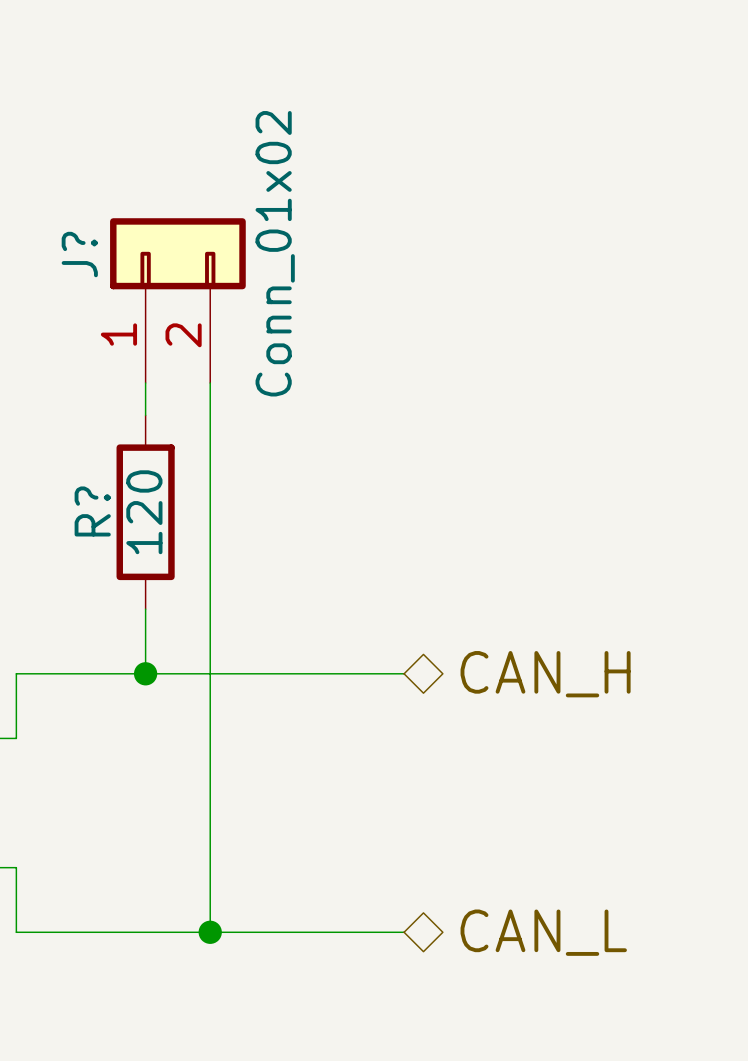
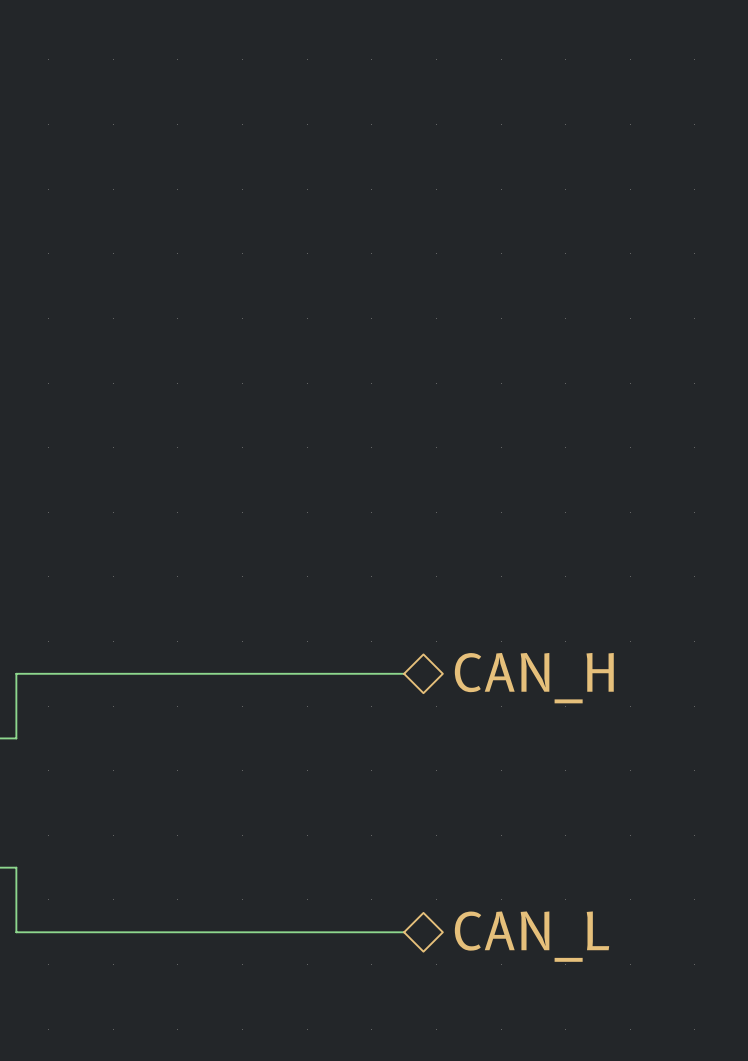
J?: Conn_01x02 (177, 300) -> none
wire: (145, 383) (145, 415) -> none
wire: (210, 383) (210, 932) -> none
R?: 120 (145, 512) -> none
wire: (145, 609) (145, 673) -> none
junction: (145, 673) -> none
junction: (210, 932) -> none

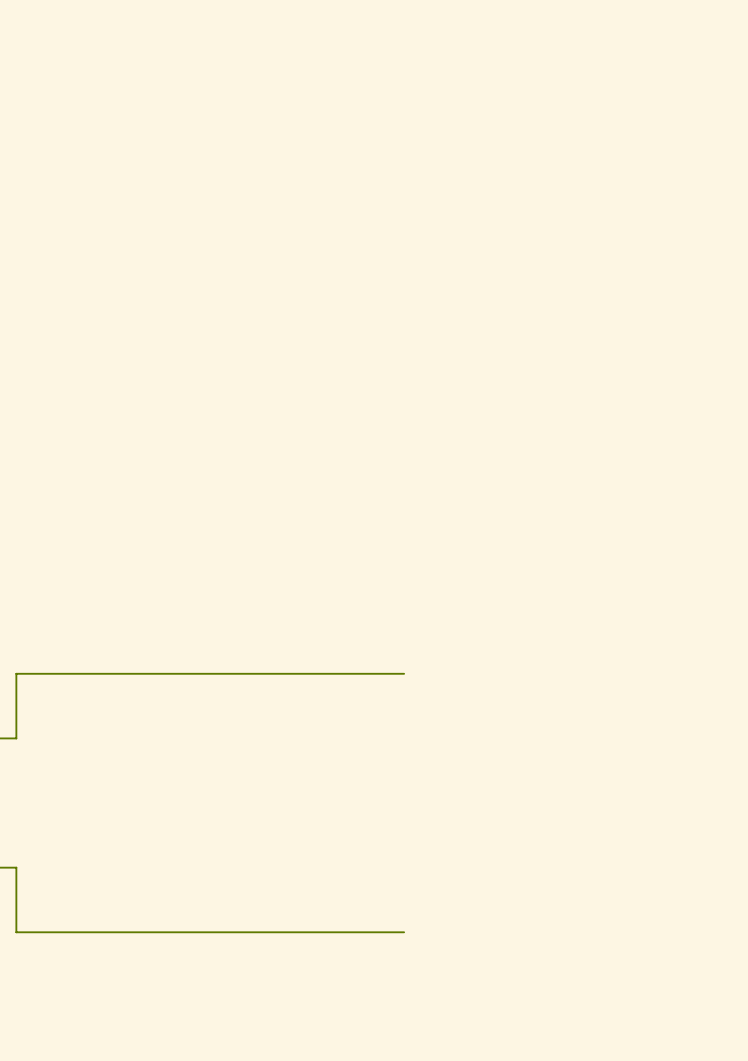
hierarchical label: CAN_H (534, 678) -> none
hierarchical label: CAN_L (532, 936) -> none

